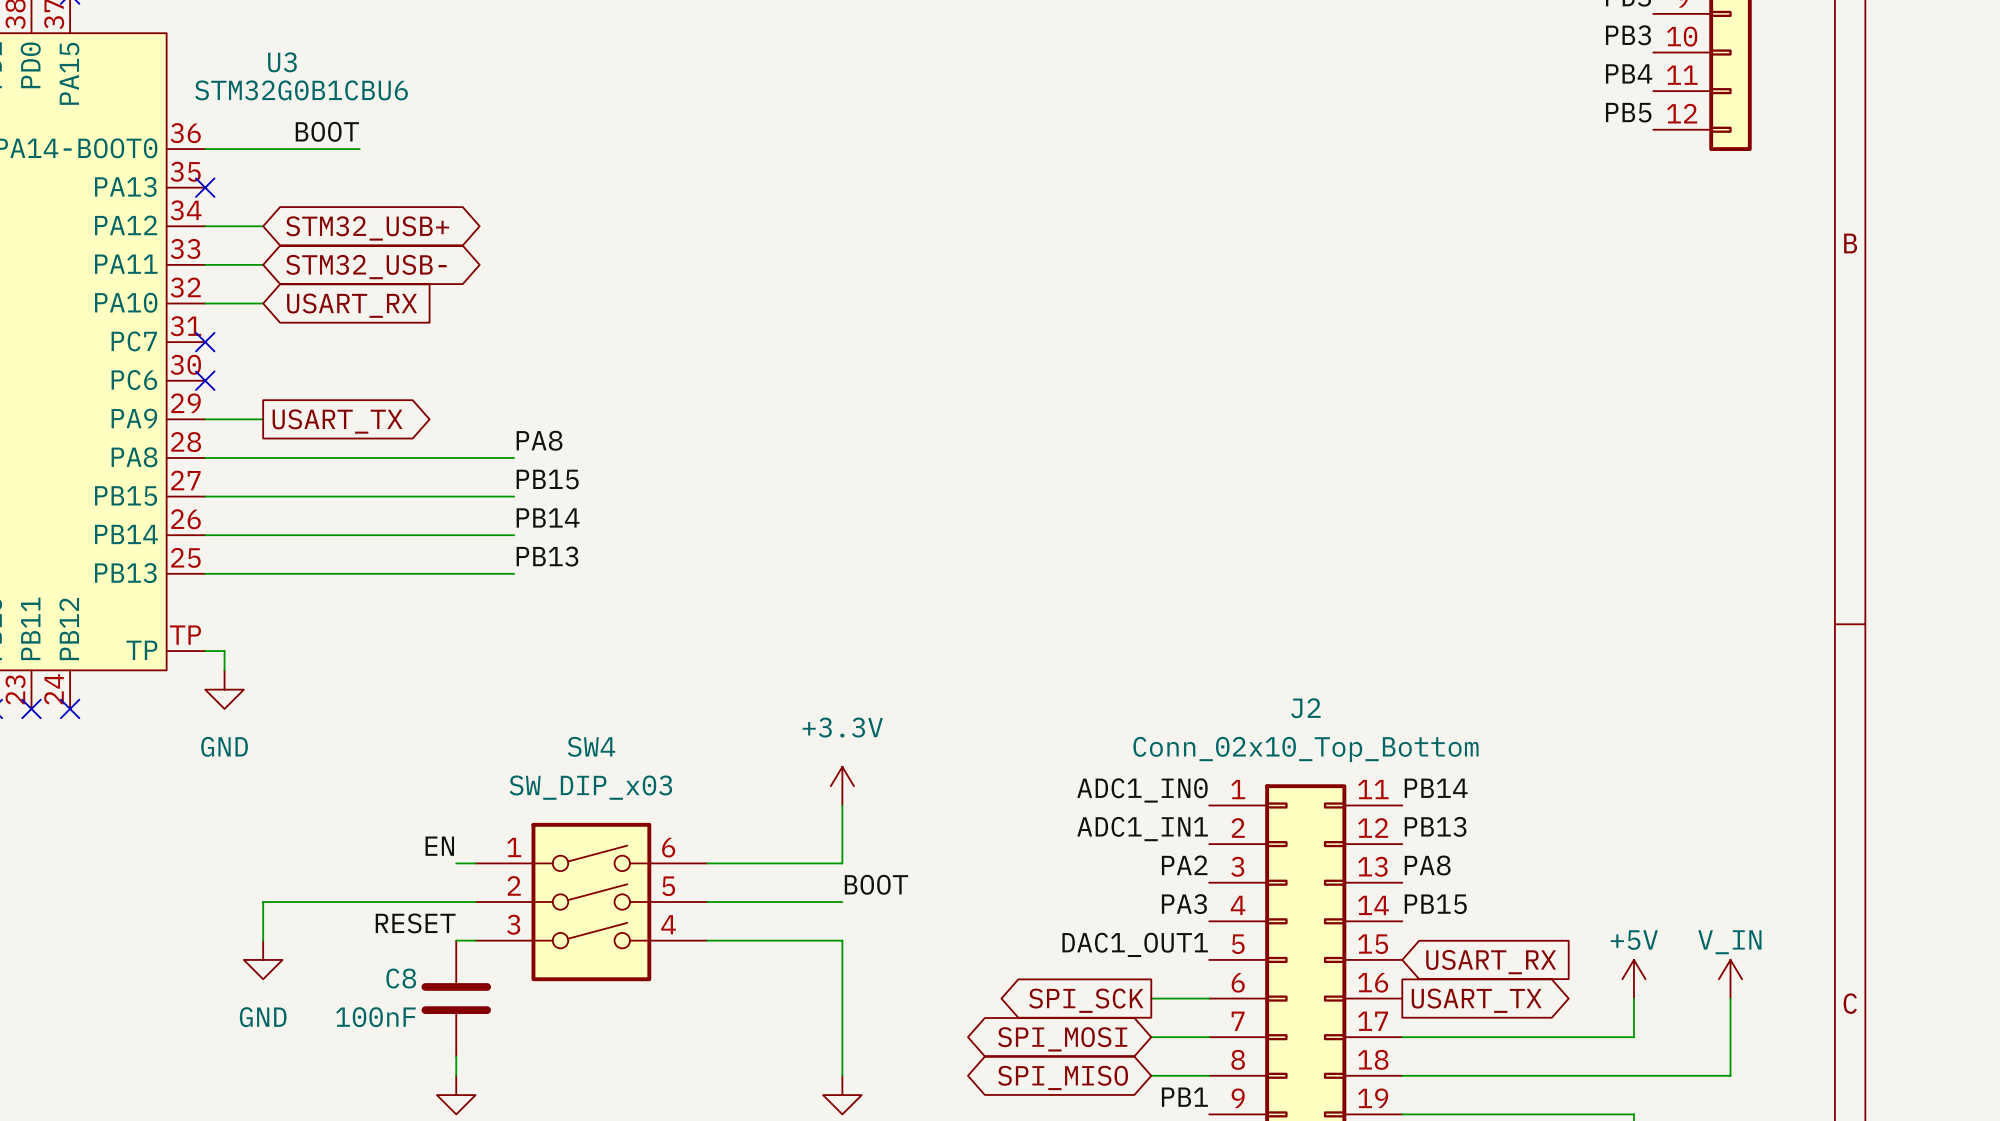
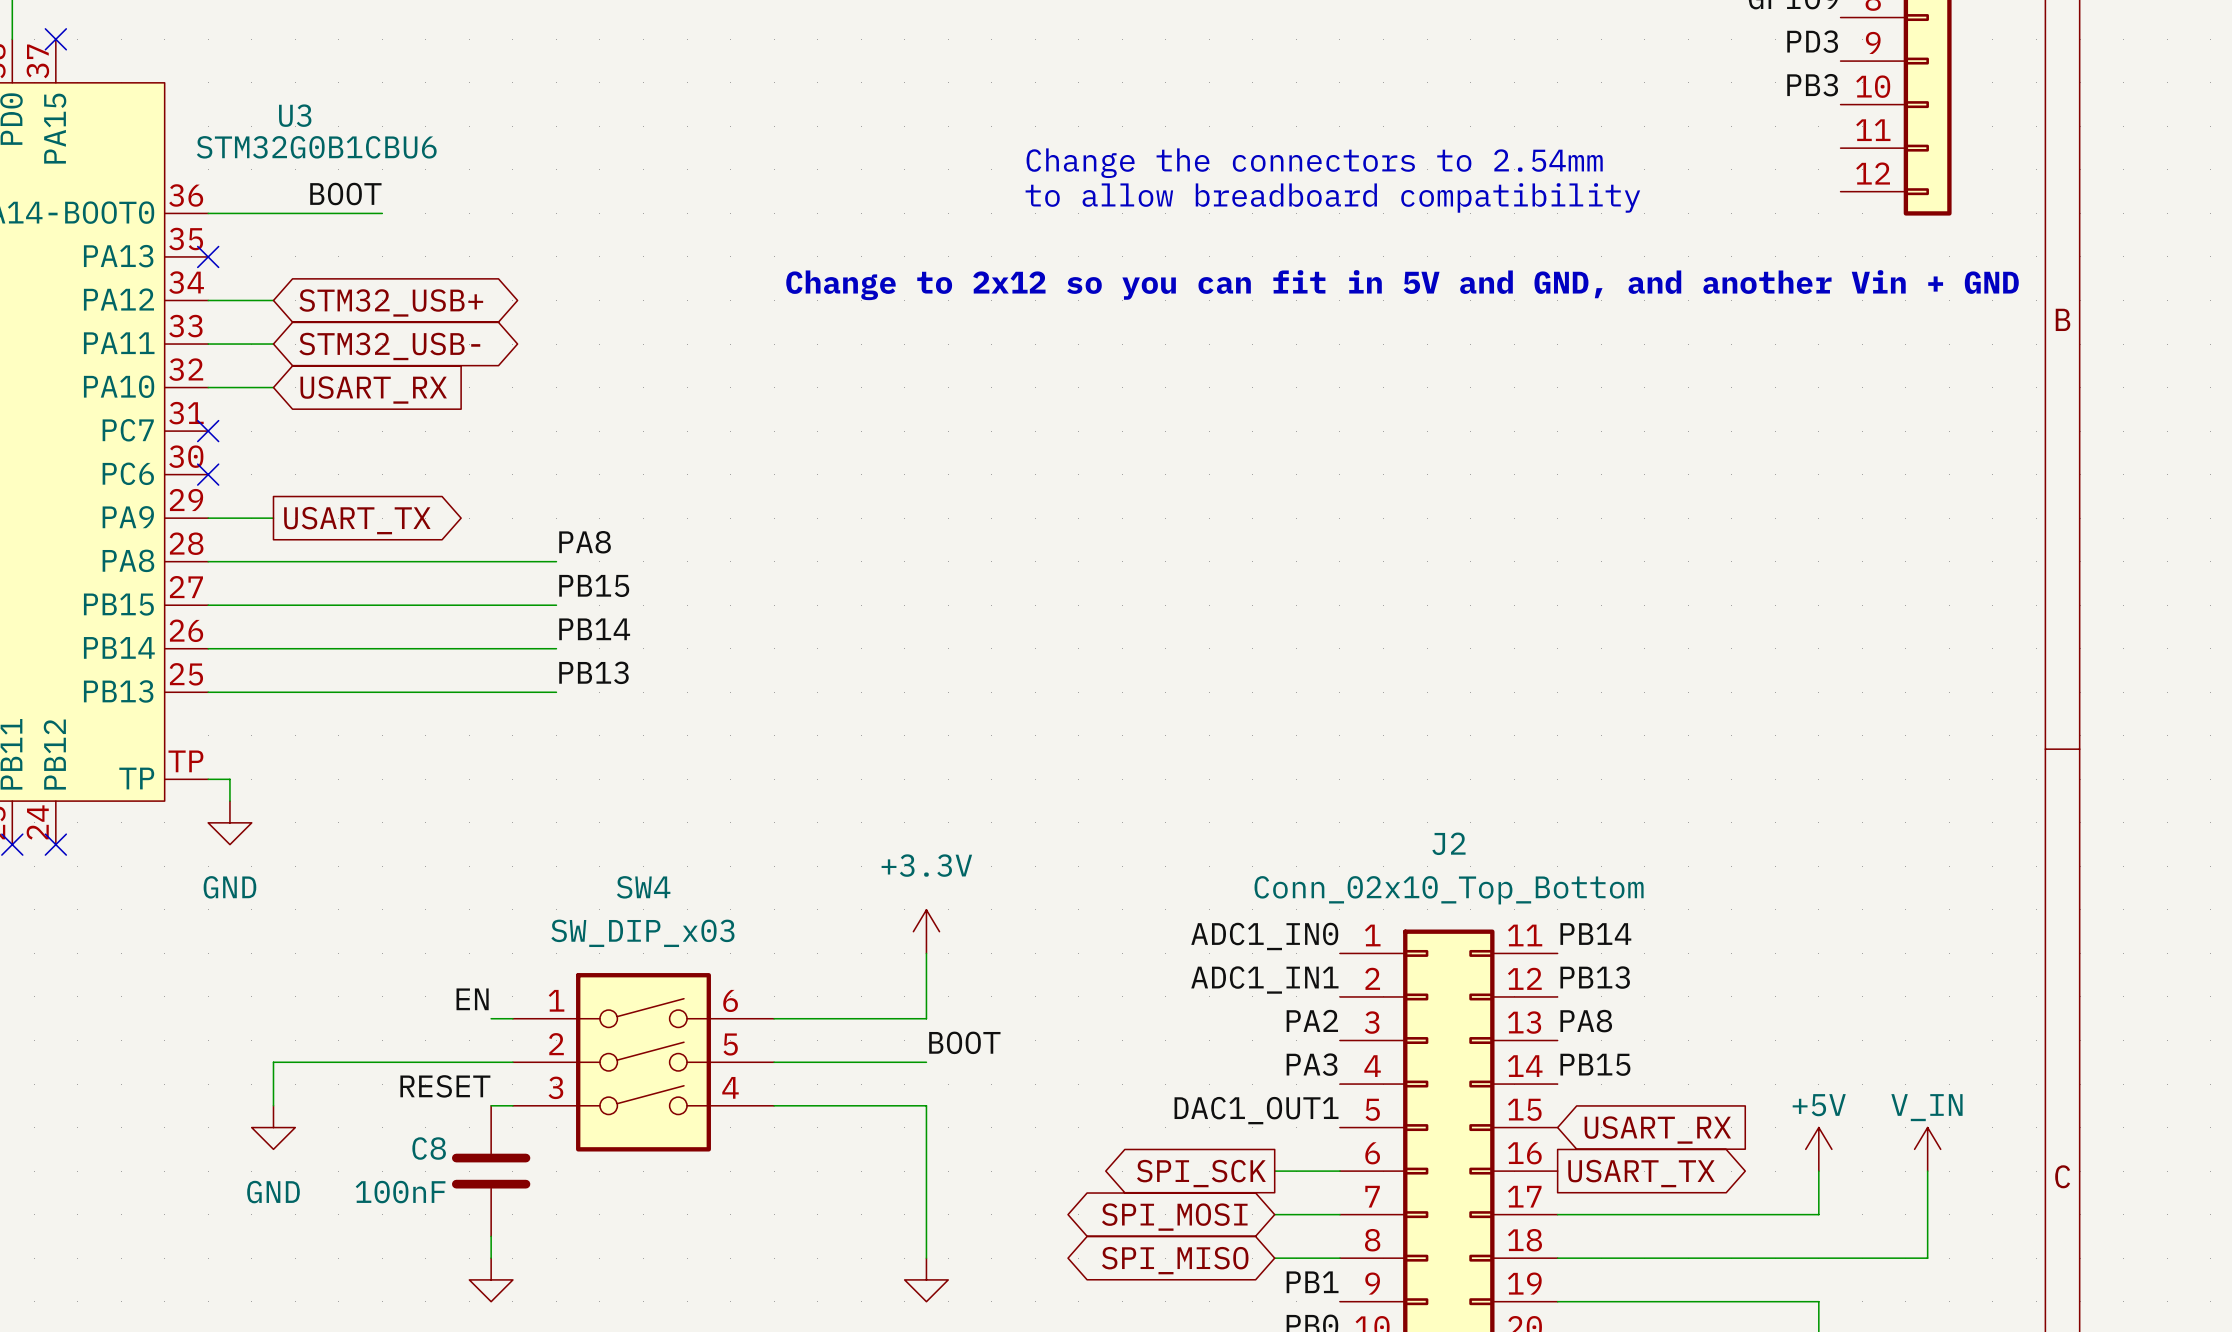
label: PB4 (1629, 73) -> none
text: none -> Change the connectors to 2.54mm (1314, 163)
label: PB5 (1628, 112) -> none
text: none -> to allow breadboard compatibility (1332, 197)
text: none -> Change to 2x12 so you can fit in 5V and GND, and another Vin + GND (1402, 285)

